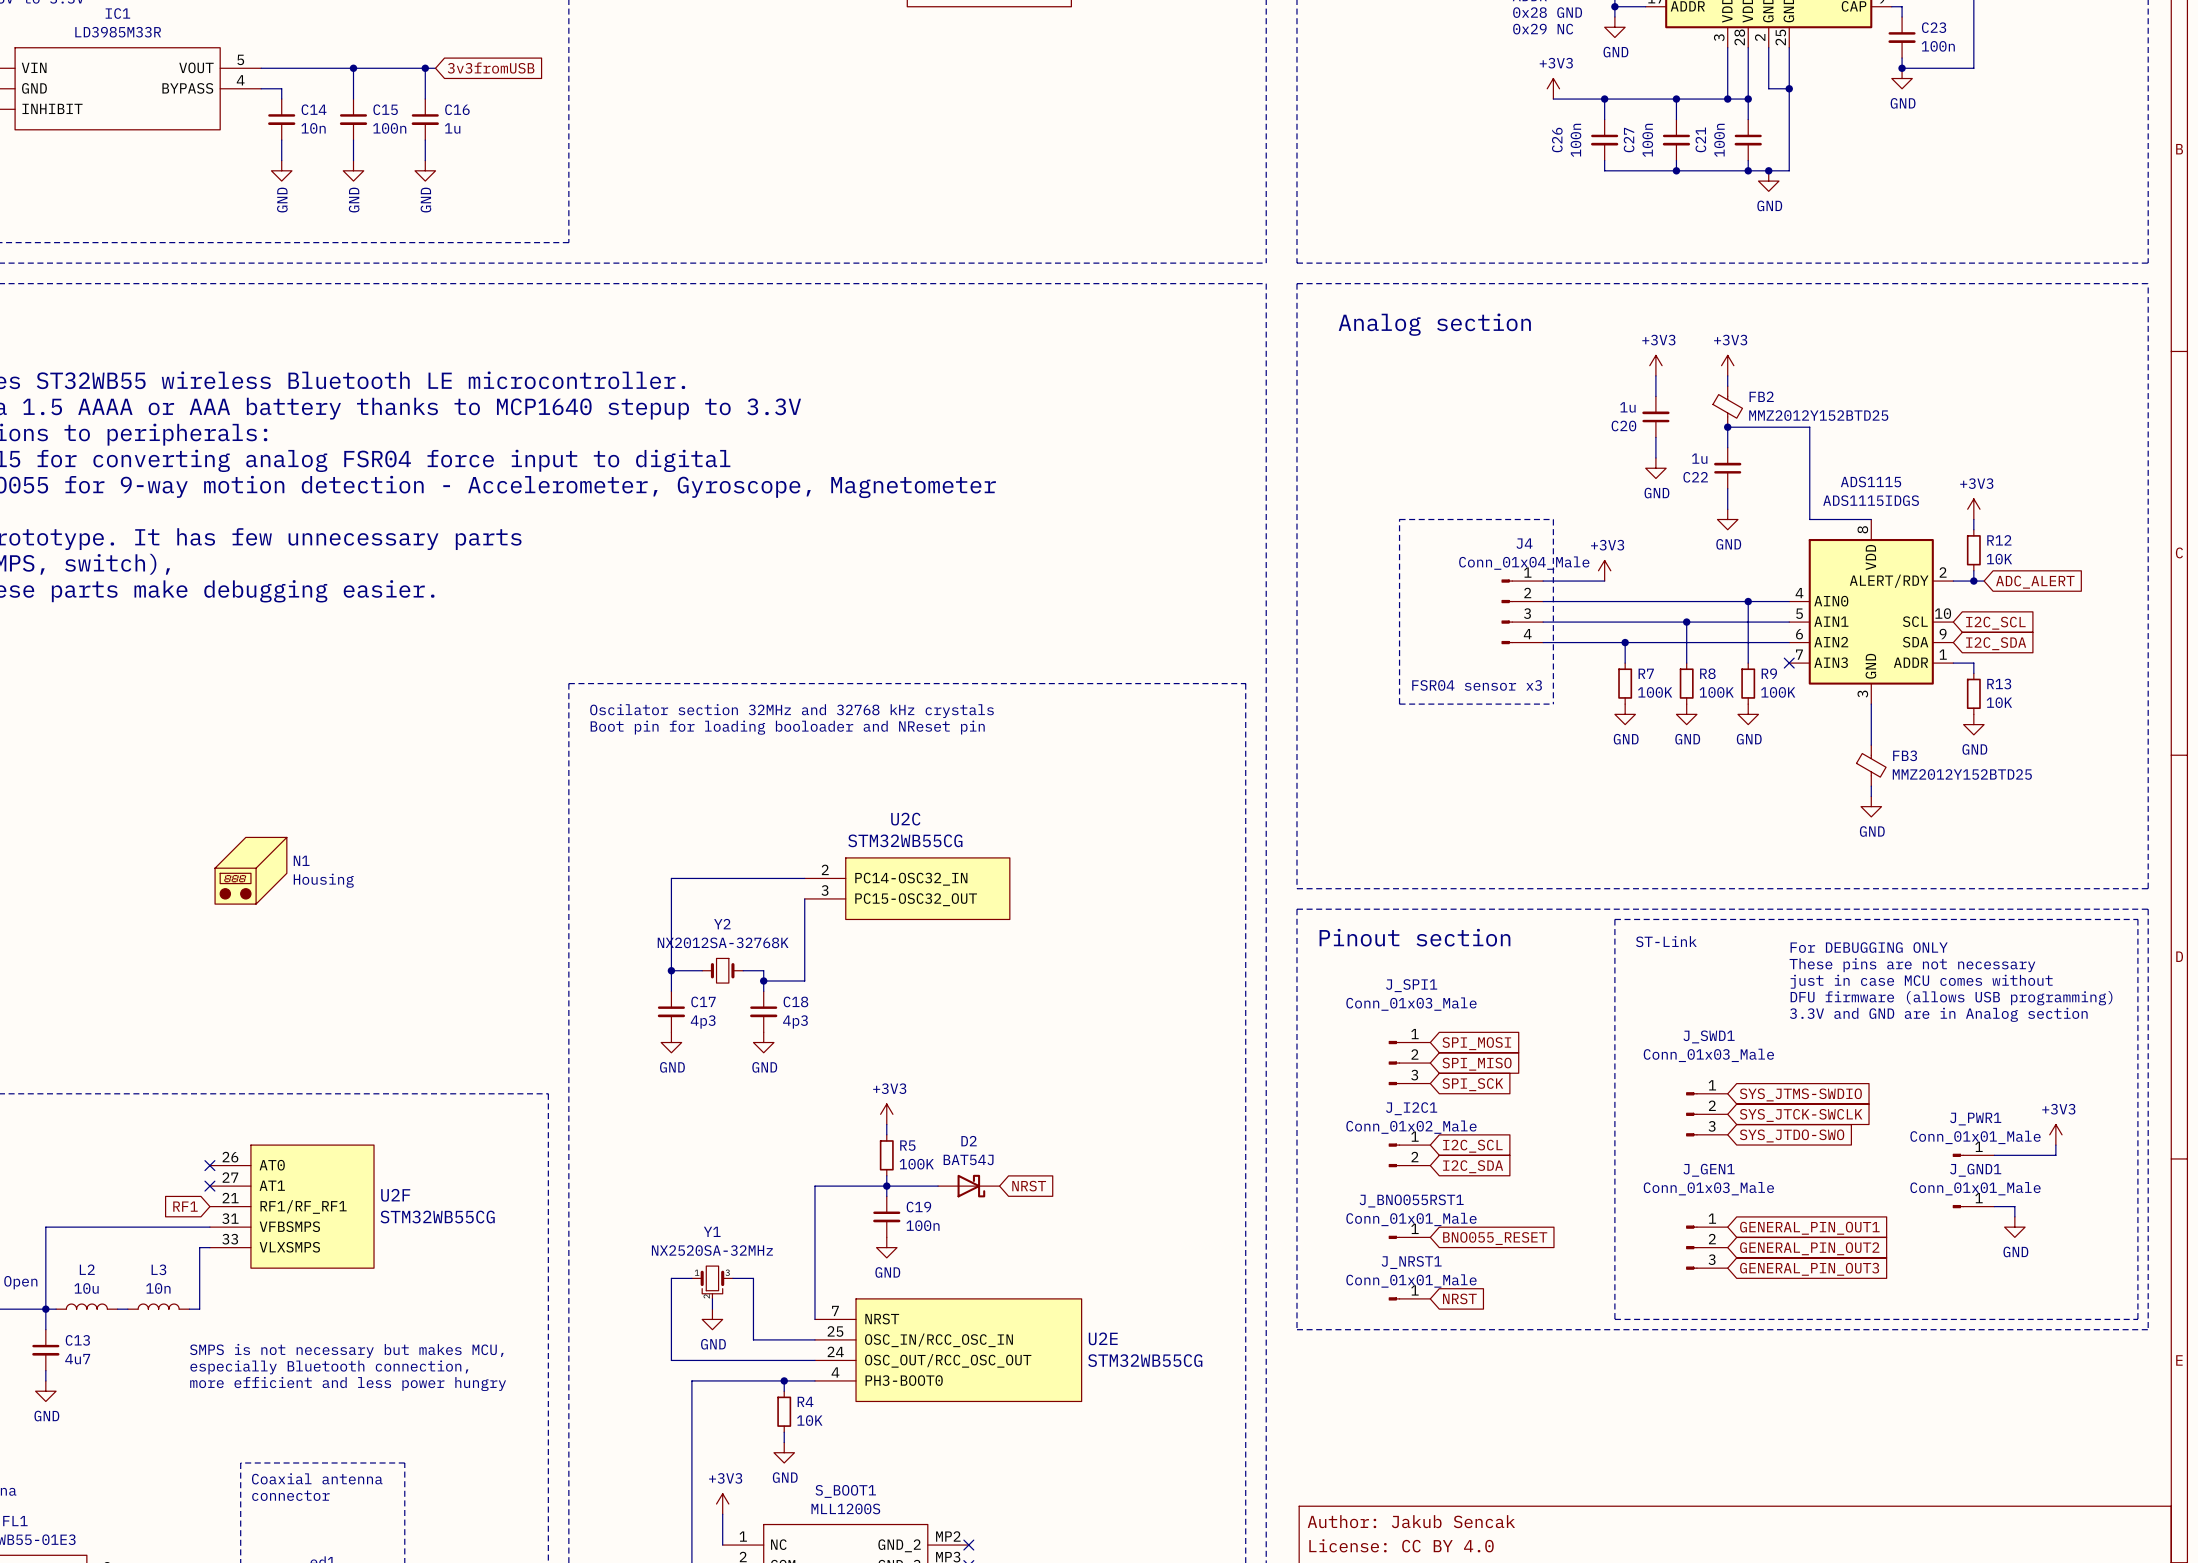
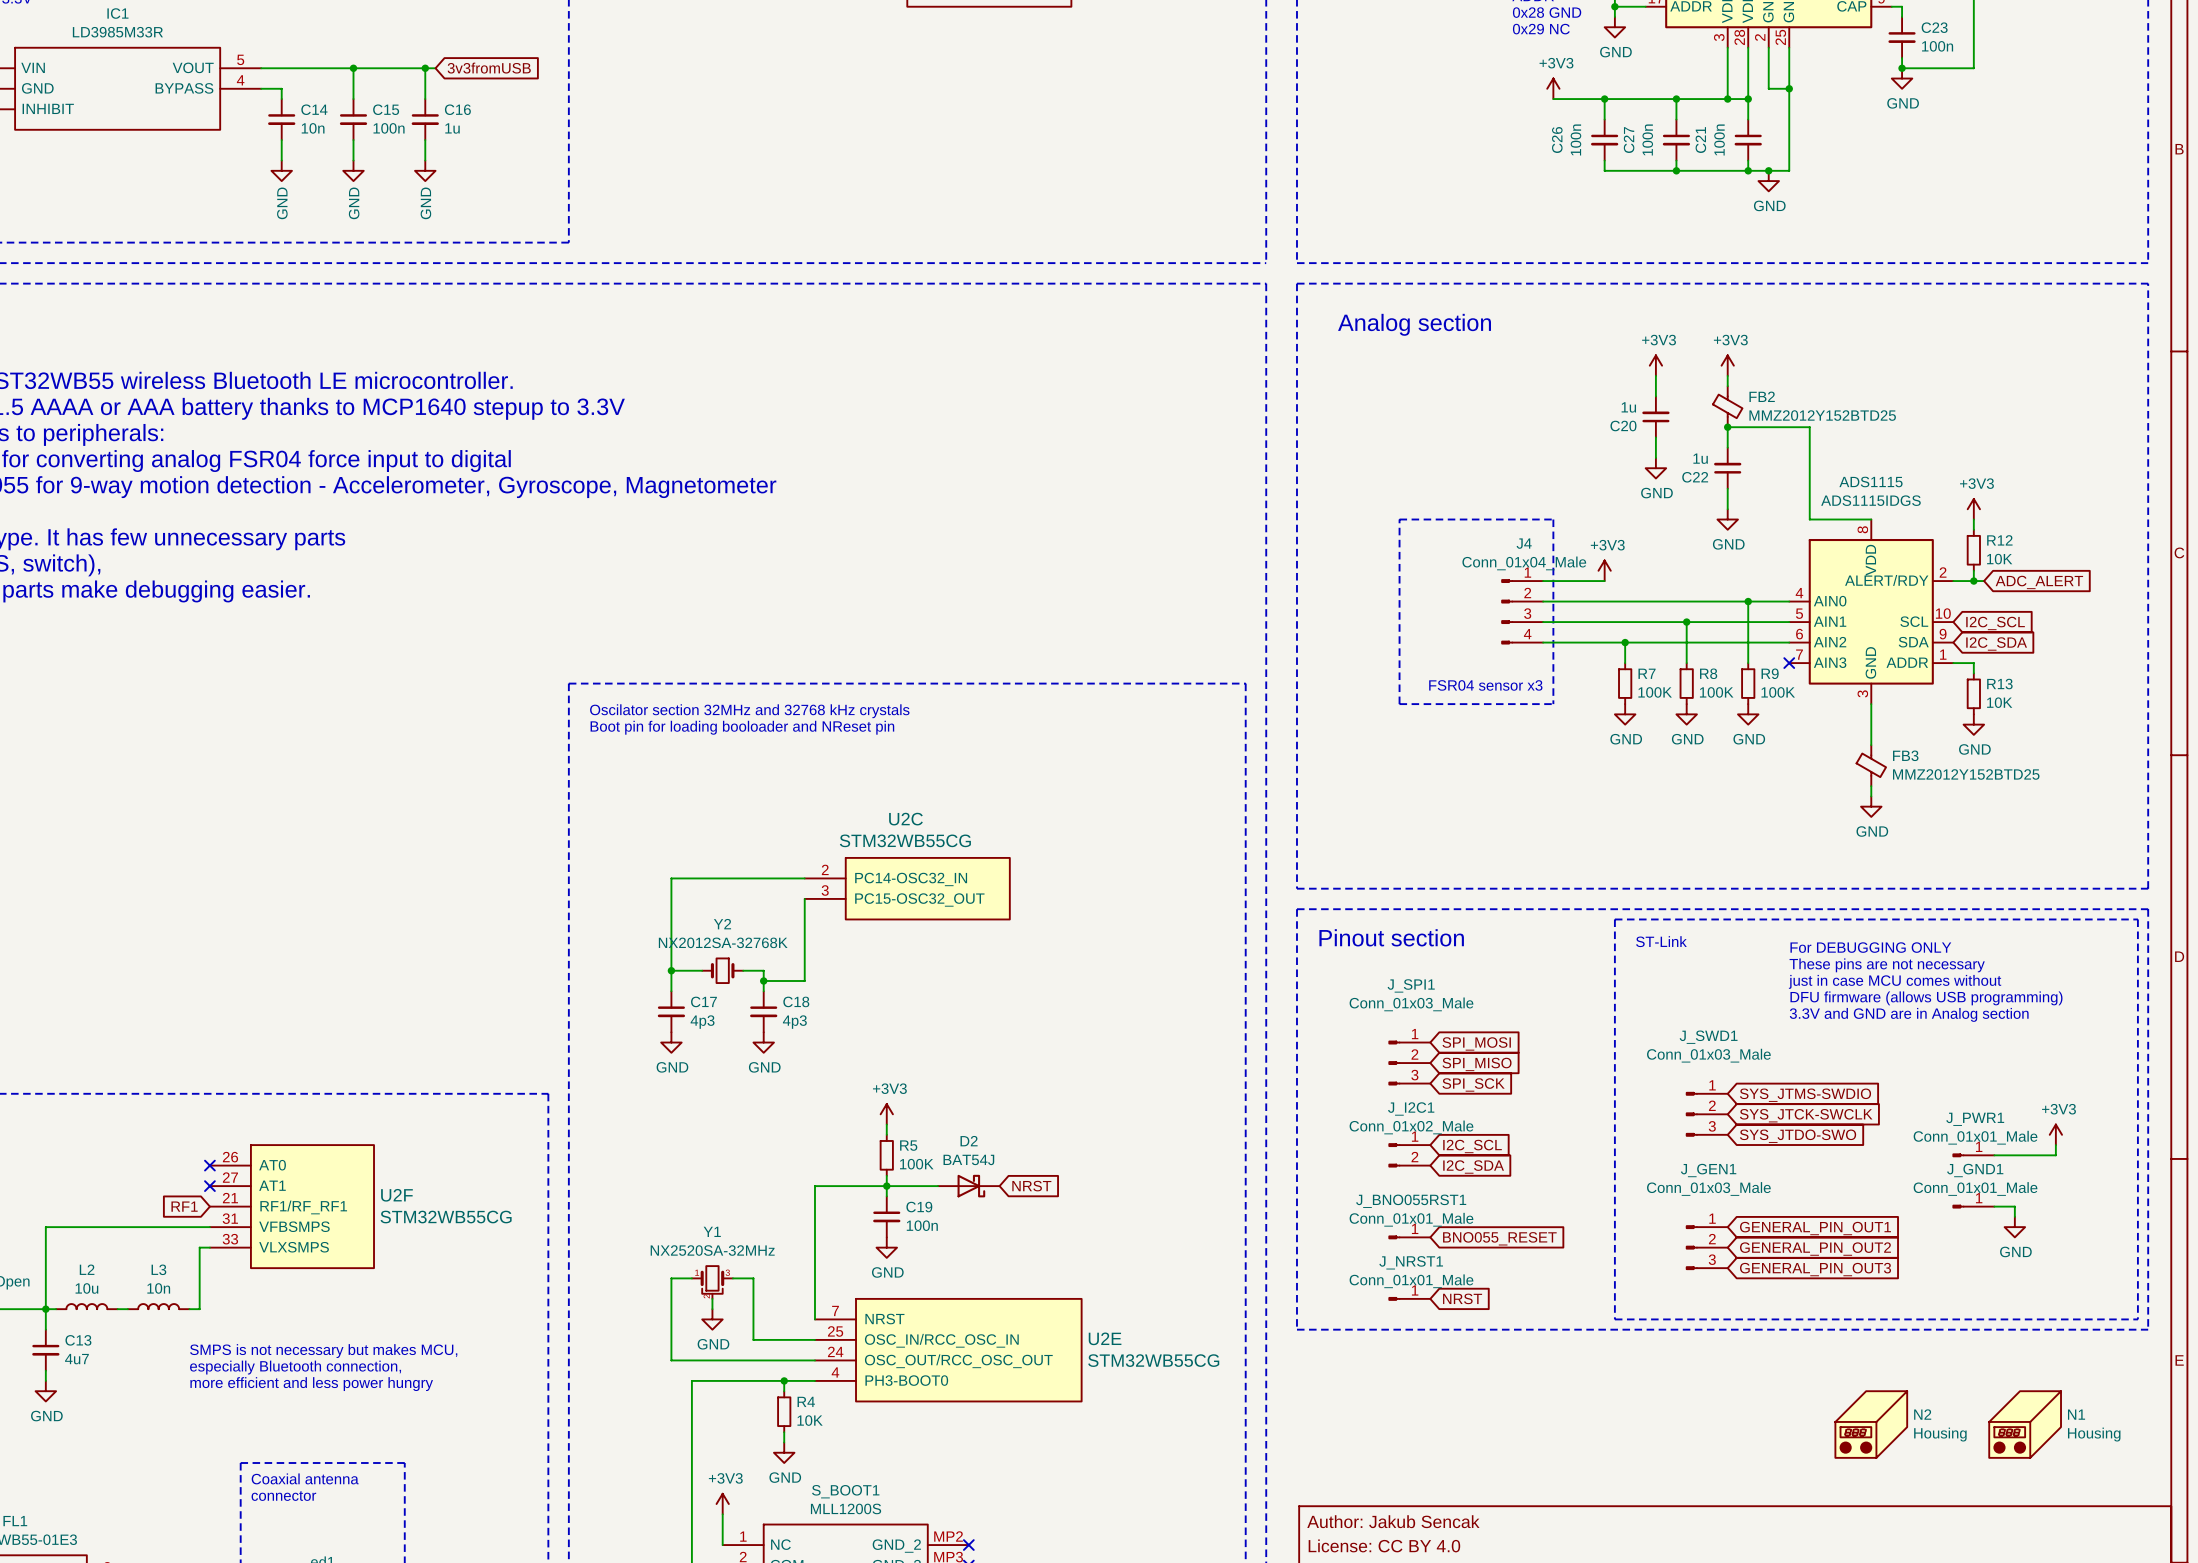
N1 position: (250, 870) -> (2025, 1424)
N2: none -> Housing (1871, 1424)

